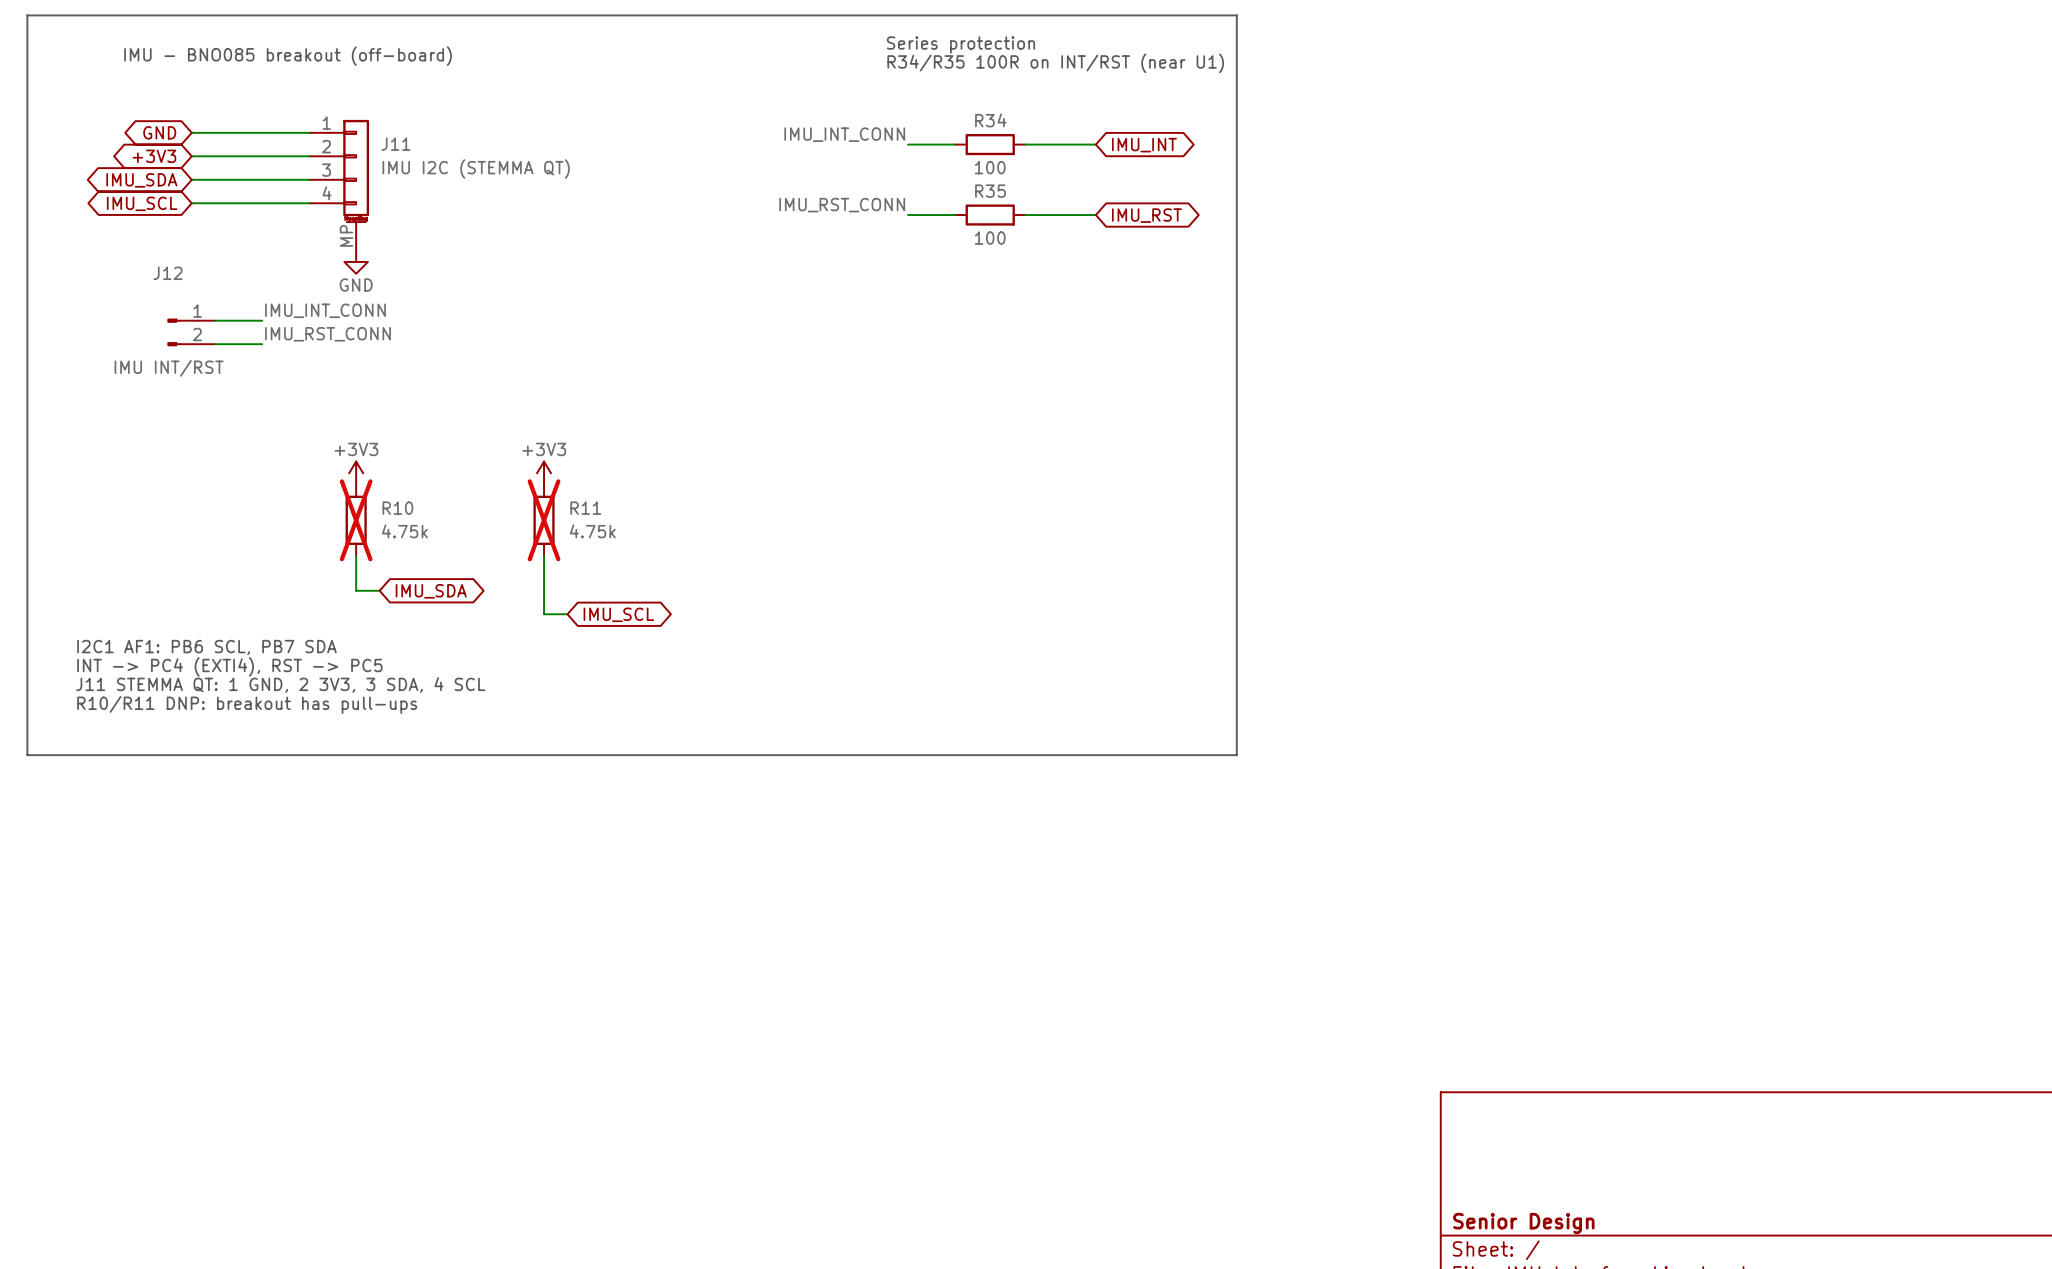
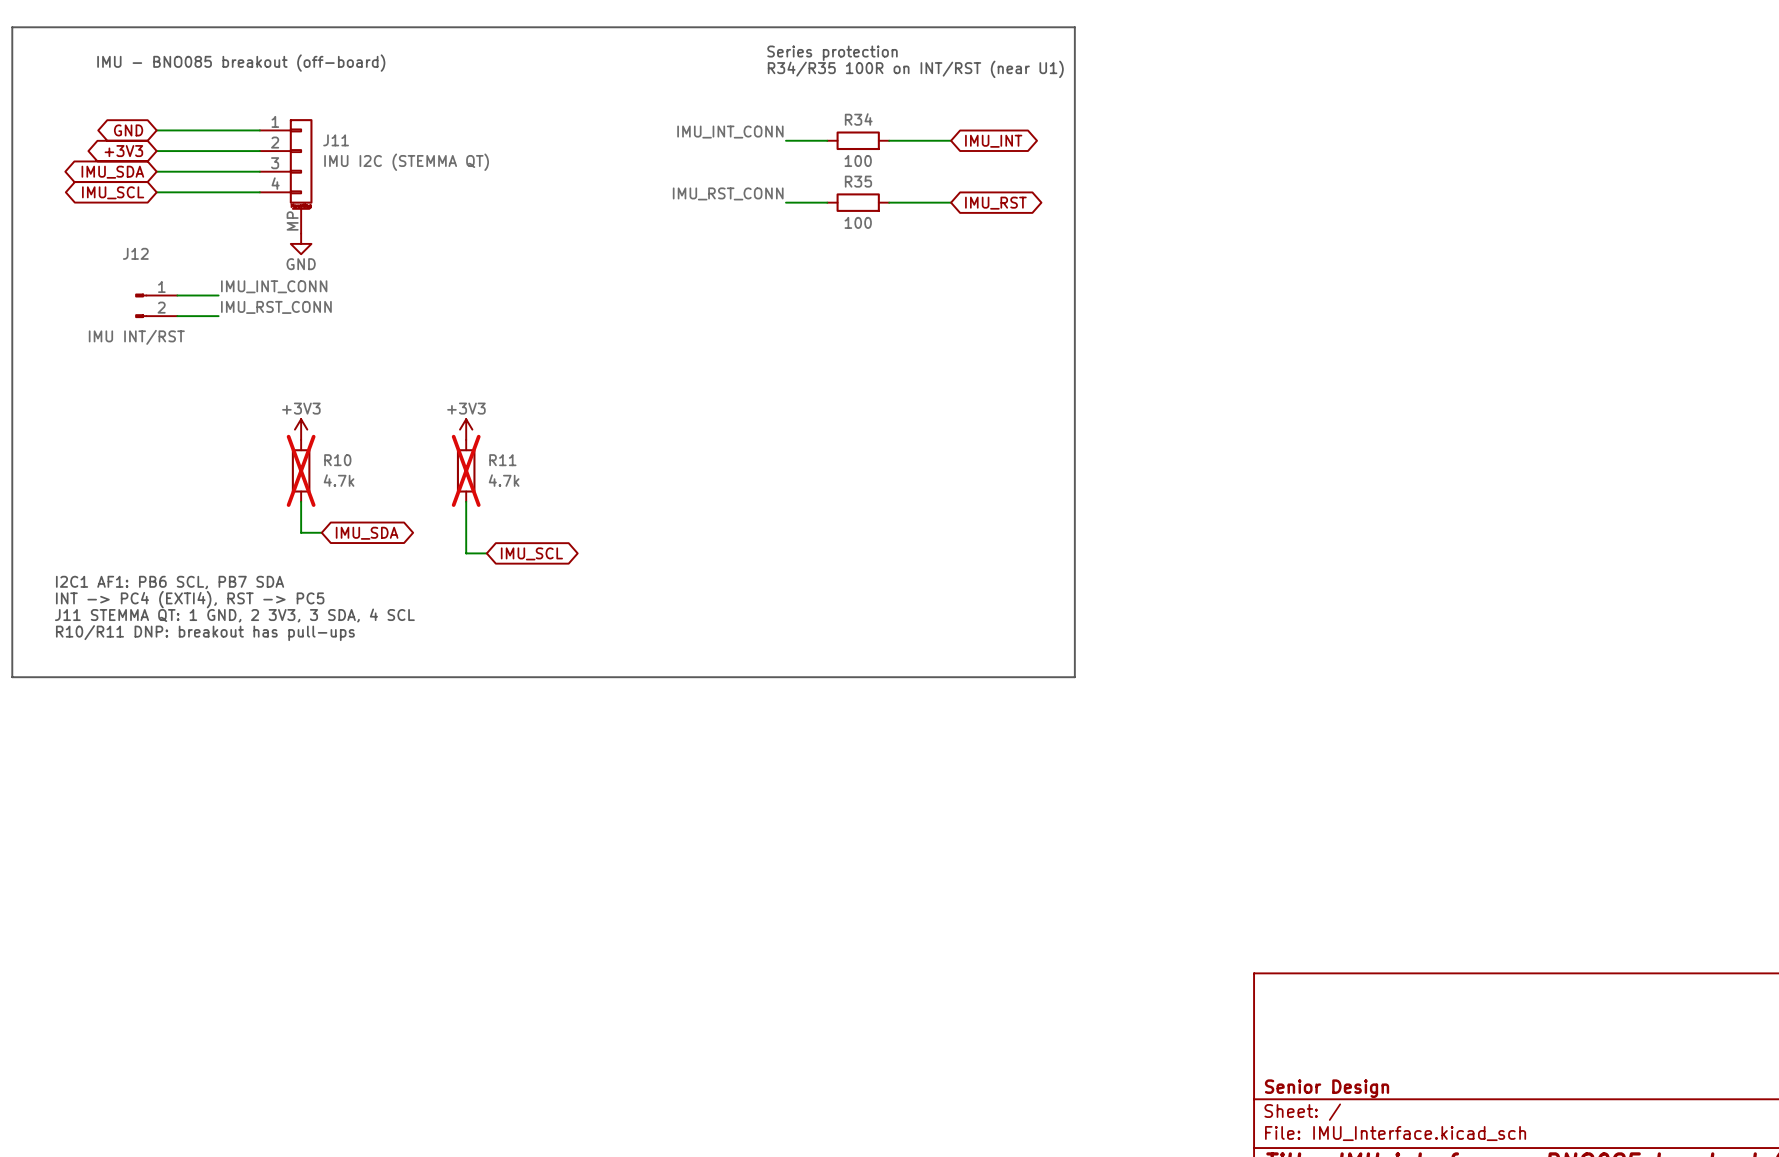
R10 value: 4.75k (404, 531) -> 4.7k (339, 480)
R11 value: 4.75k (592, 531) -> 4.7k (504, 480)

